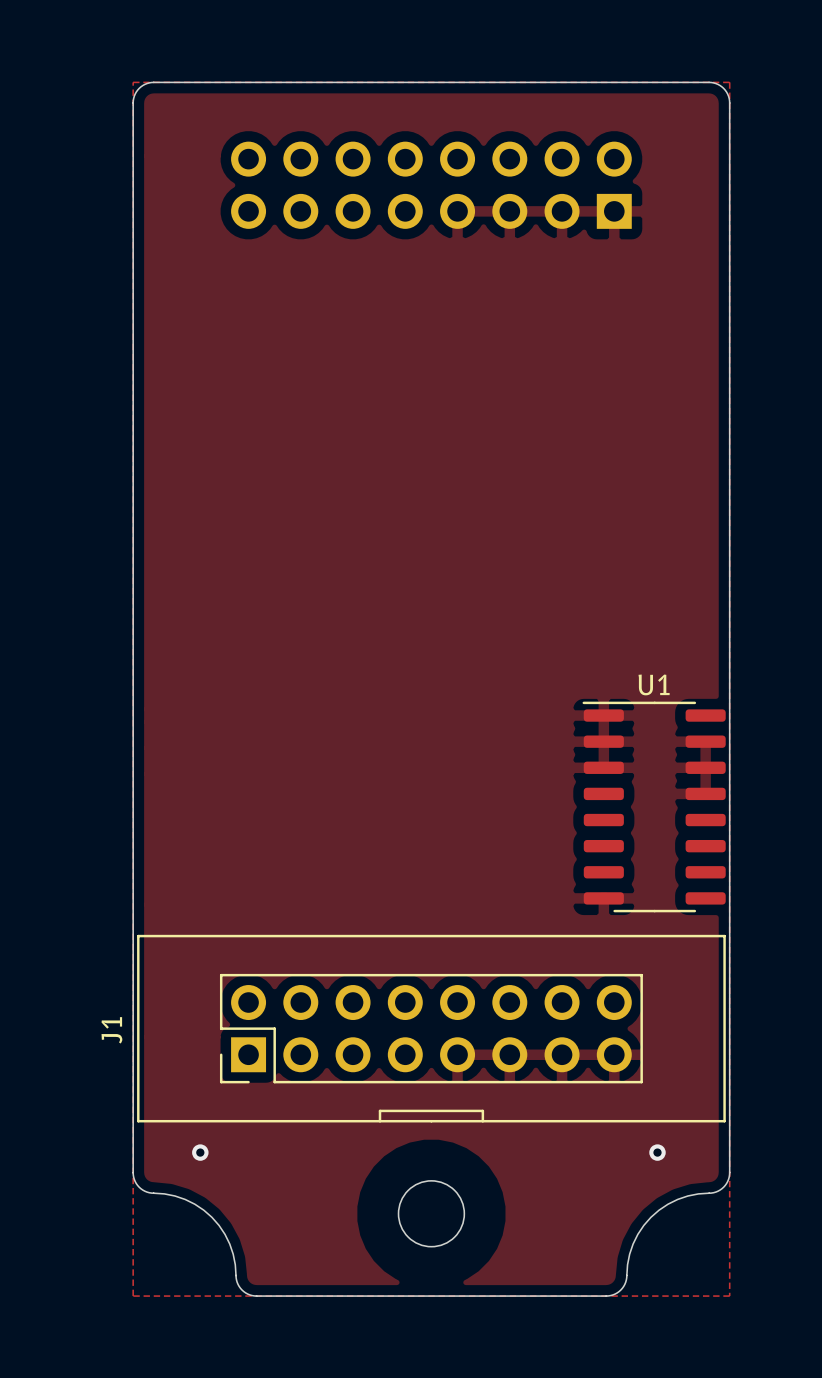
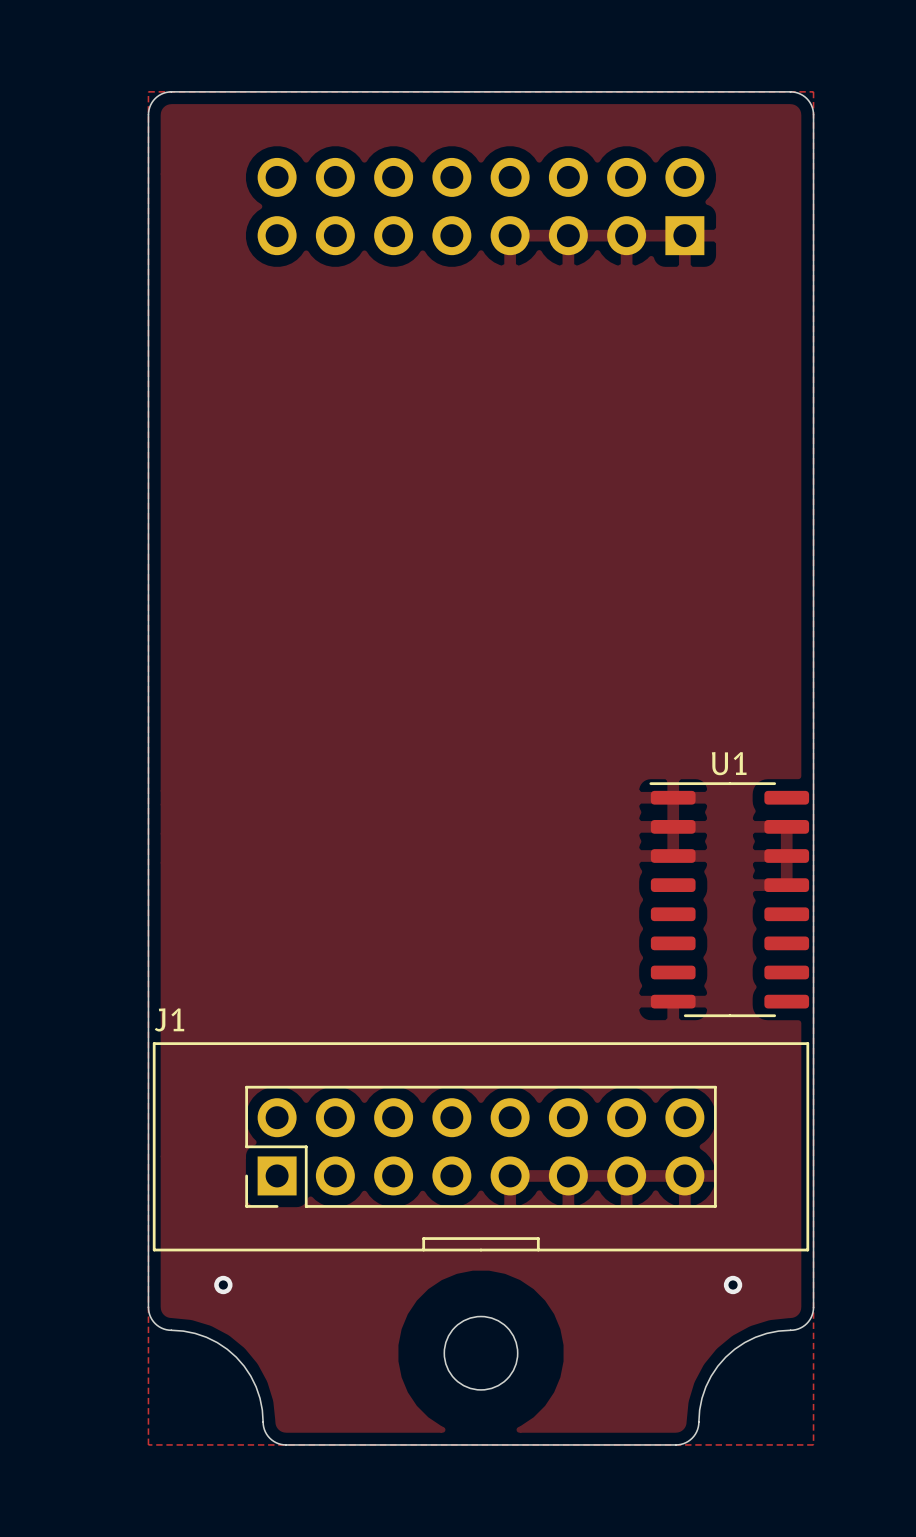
J1 name rotation: 0° (111, 1030) -> 90° clockwise (169, 1019)
J1 name position: J1 (111, 1030) -> J1 (169, 1019)

